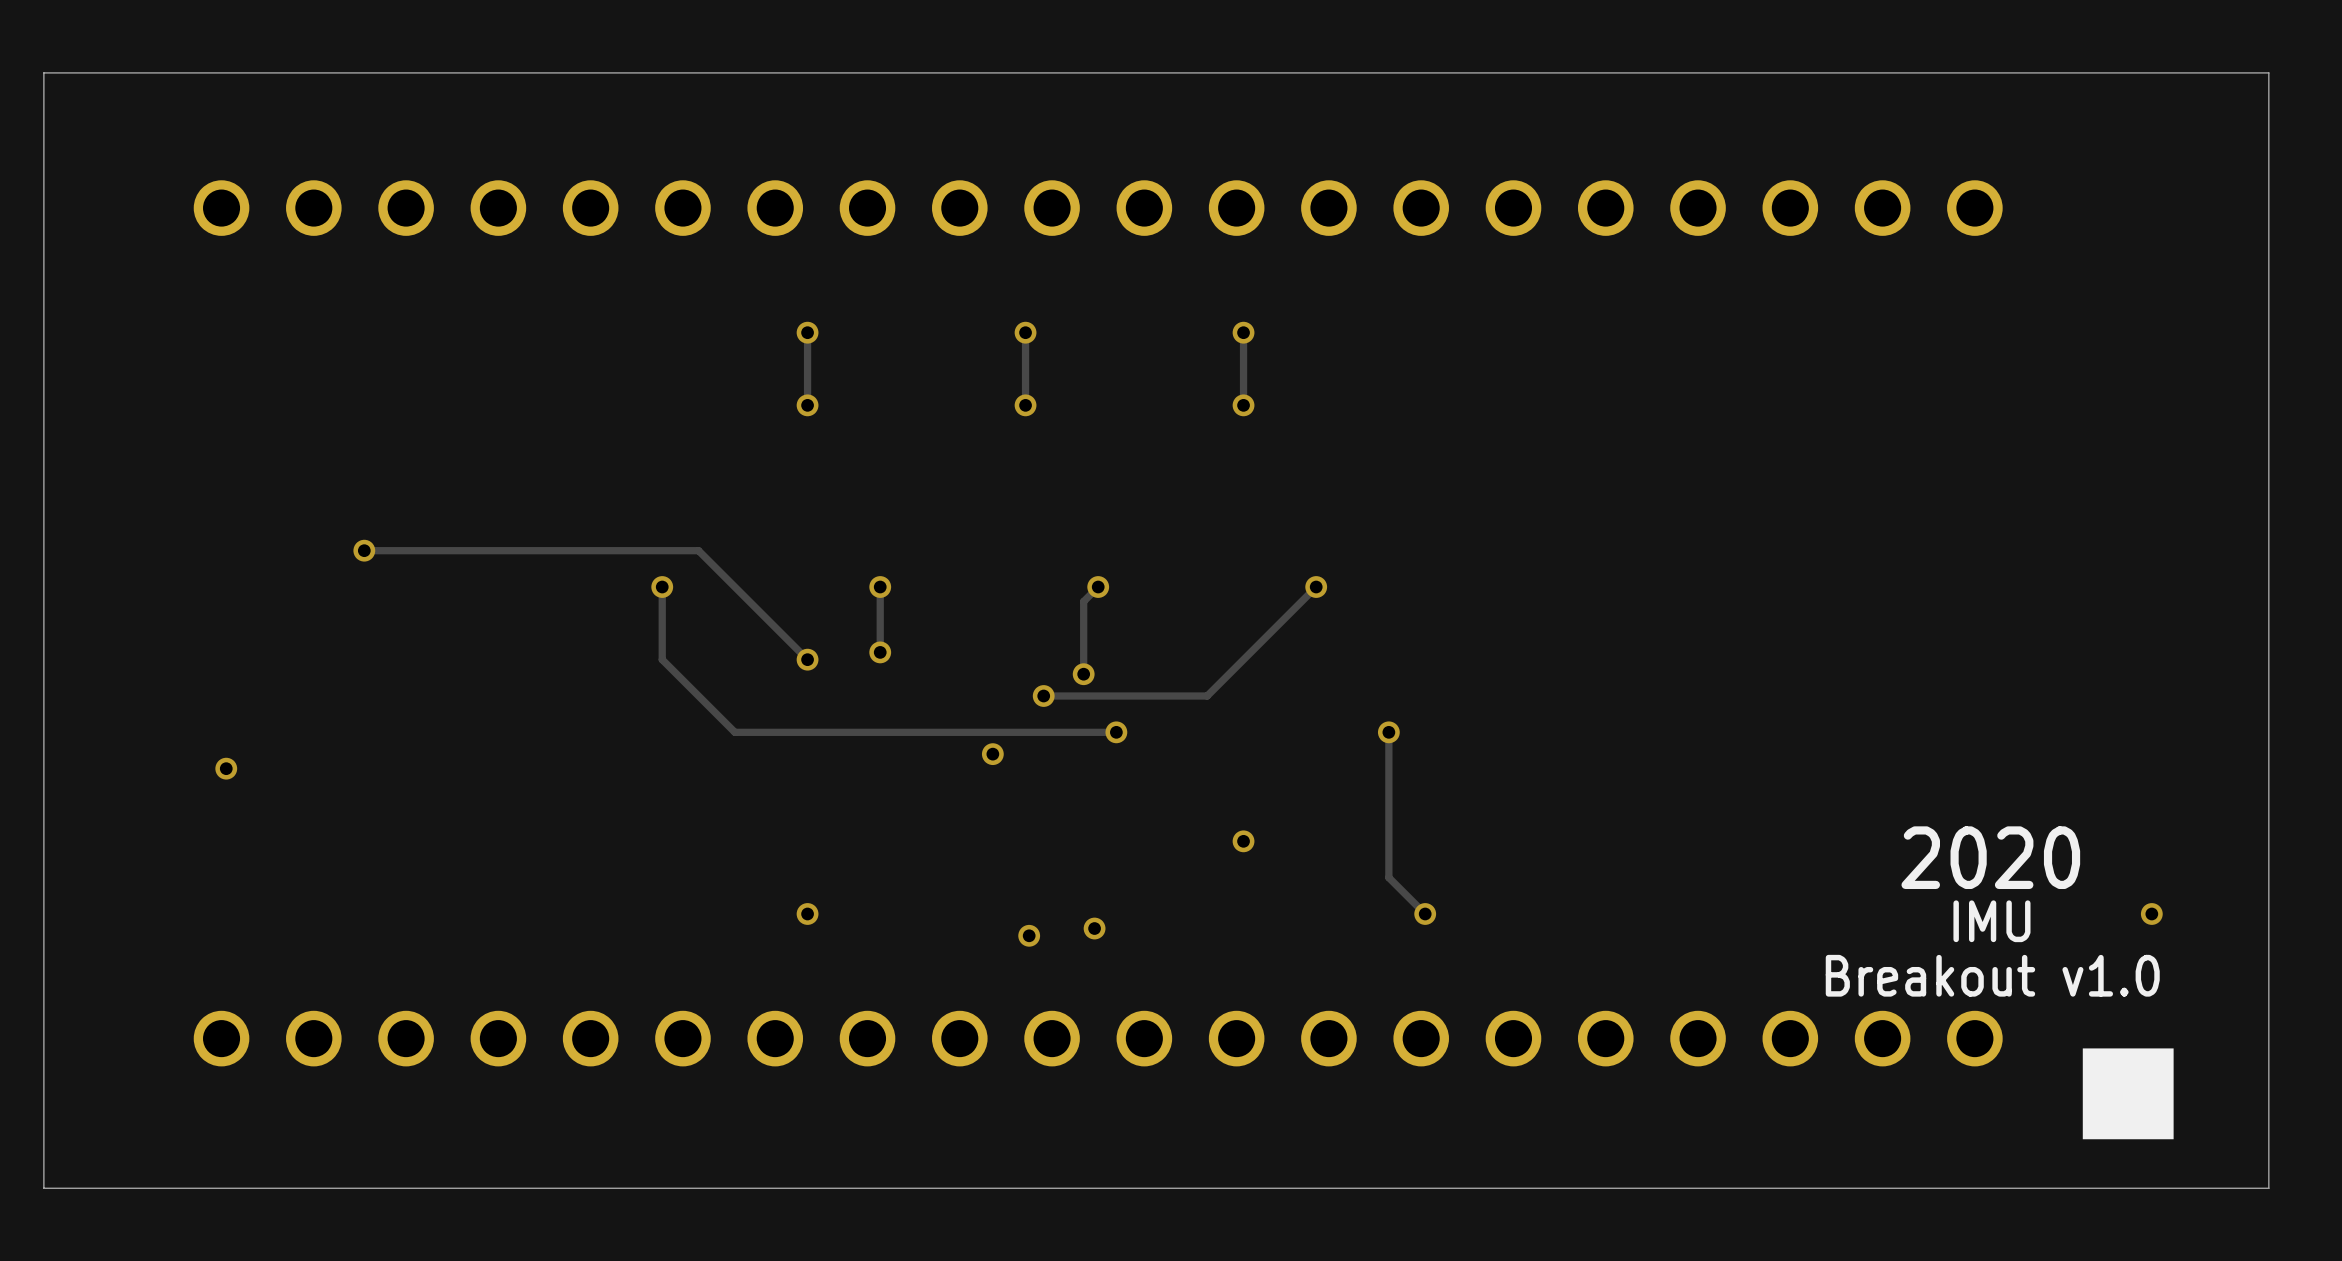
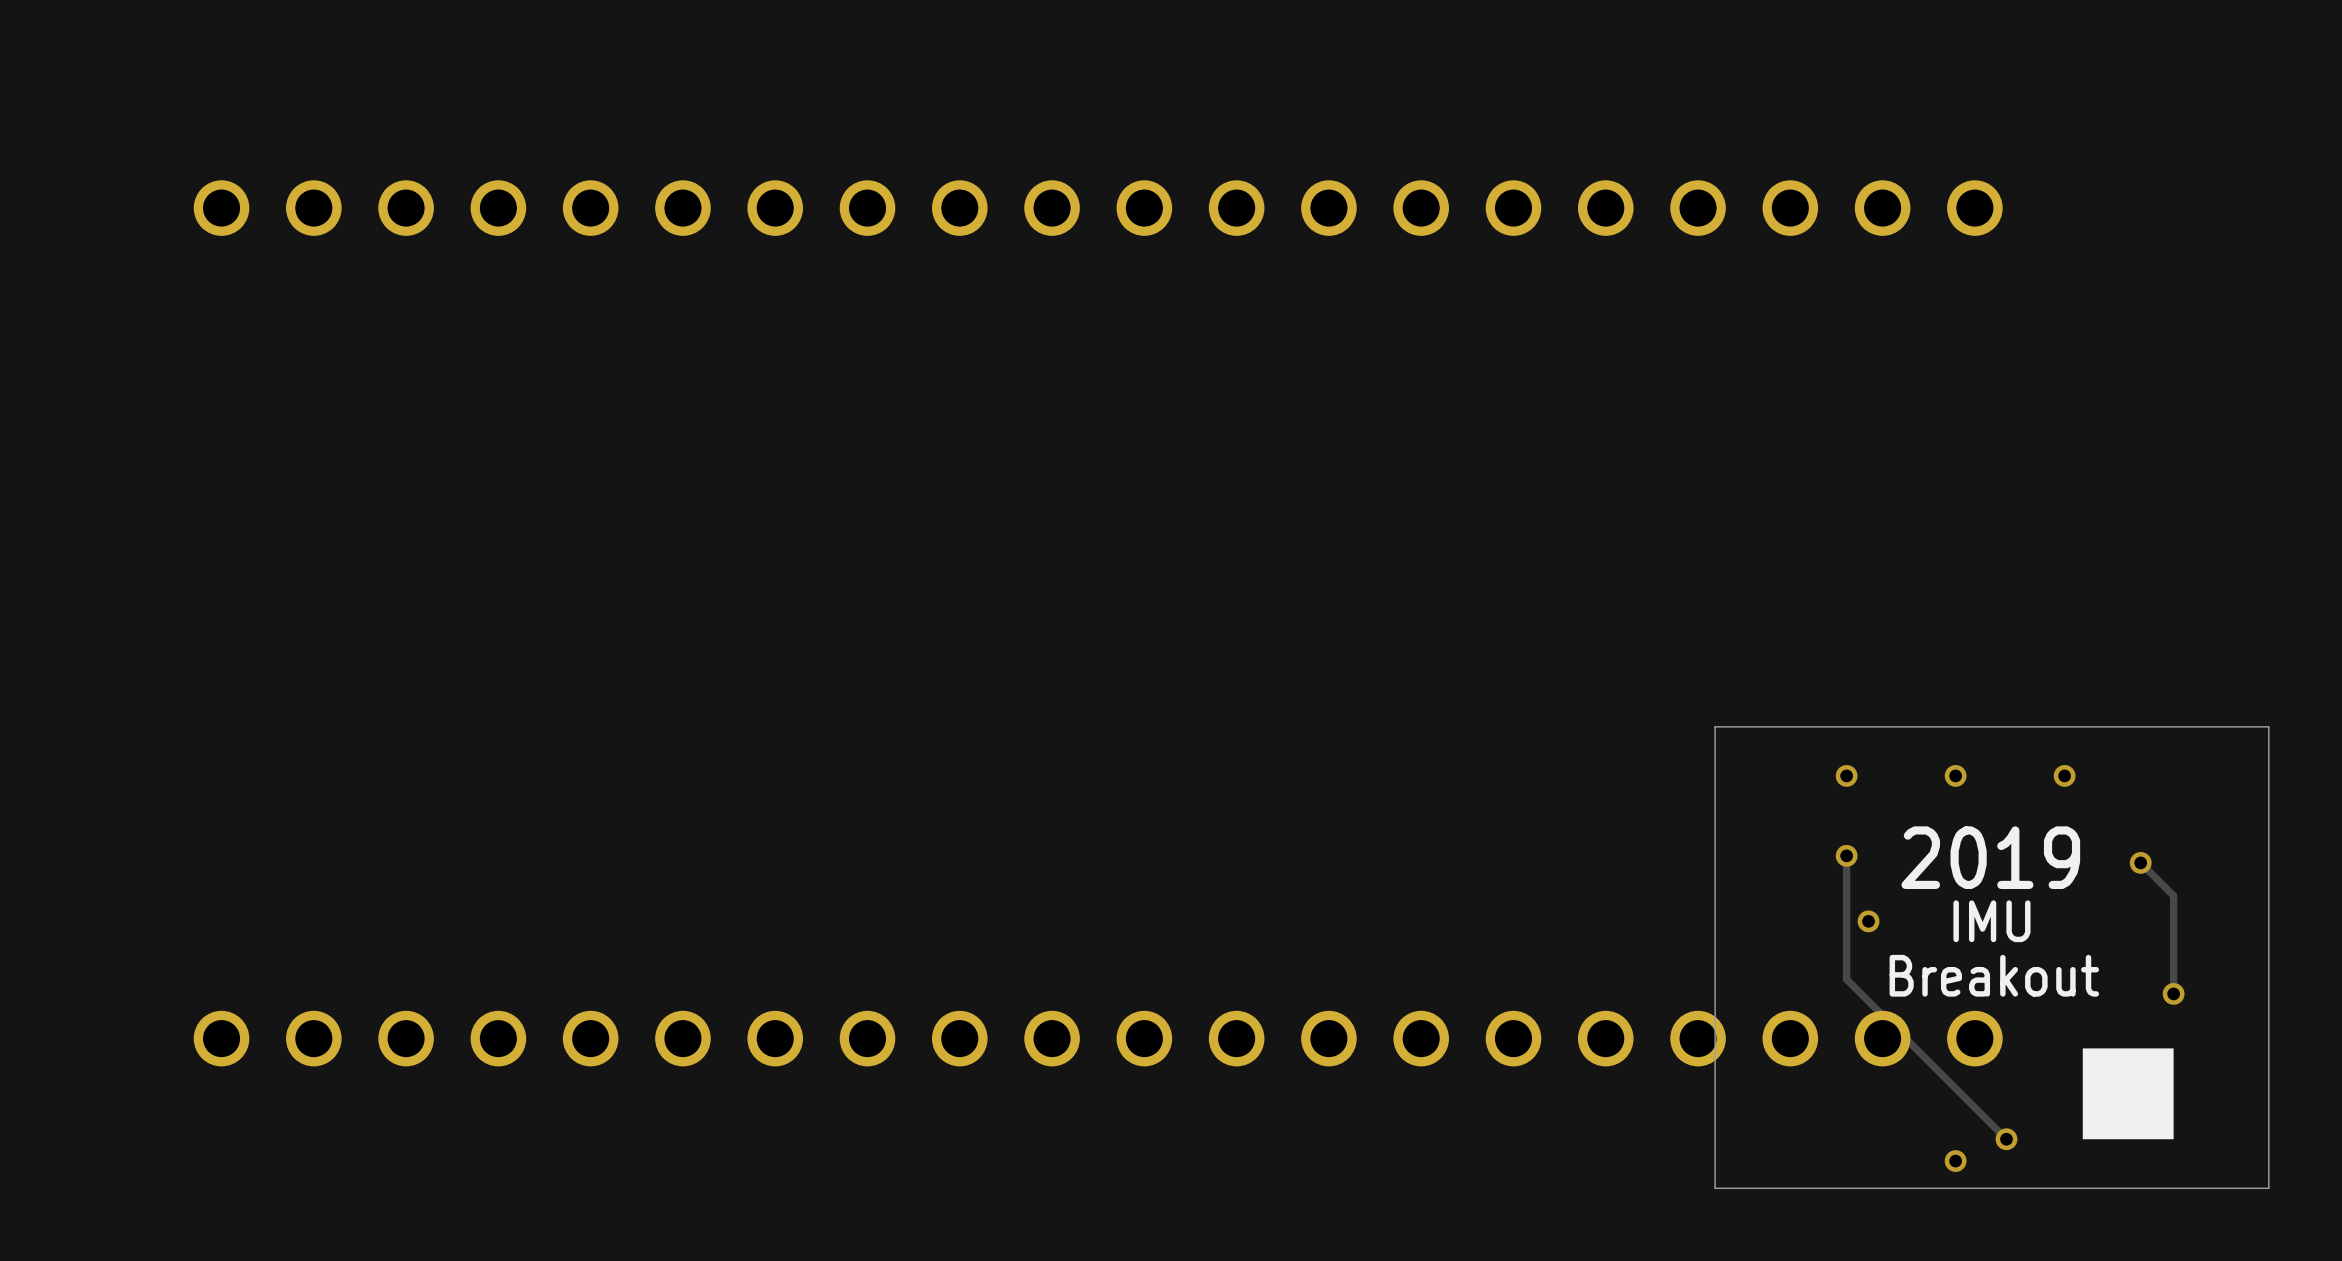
track: (807, 332) (807, 405) -> none
via: (807, 332) -> none
track: (1025, 332) (1025, 405) -> none
via: (1025, 332) -> none
track: (1243, 332) (1243, 405) -> none
via: (1243, 332) -> none
via: (807, 405) -> none
via: (1025, 405) -> none
via: (1243, 405) -> none
track: (364, 550) (698, 550) (807, 659) -> none
via: (364, 550) -> none
track: (662, 587) (662, 659) (734, 732) (1116, 732) -> none
via: (662, 587) -> none
track: (880, 587) (880, 652) -> none
via: (880, 587) -> none
track: (1098, 587) (1083, 601) (1083, 674) -> none
via: (1098, 587) -> none
track: (1316, 587) (1207, 696) (1043, 696) -> none
via: (1316, 587) -> none
via: (880, 652) -> none
via: (807, 659) -> none
via: (1083, 674) -> none
via: (1043, 696) -> none
board edge: (2268, 726) (2268, 72) (43, 72) (43, 1188) (1715, 1188) -> (2268, 726) (1715, 726) (1715, 1188)
via: (1116, 732) -> none
track: (1388, 732) (1388, 877) (1425, 913) -> none
via: (1388, 732) -> none
via: (992, 754) -> none
via: (226, 768) -> none
via: none -> (1846, 775)
via: none -> (1955, 775)
via: none -> (2064, 775)
via: (1243, 841) -> none
track: none -> (1846, 855) (1846, 979) (2006, 1139)
via: none -> (1846, 855)
text: 2020 (1990, 857) -> 2019 (1990, 857)
track: none -> (2140, 862) (2173, 895) (2173, 993)
via: none -> (2140, 862)
via: (807, 913) -> none
via: (1425, 913) -> none
via: (2151, 913) -> none
via: none -> (1868, 921)
via: (1094, 928) -> none
via: (1029, 935) -> none
text: Breakout v1.0 (1992, 975) -> Breakout (1994, 975)
via: none -> (2173, 993)
via: none -> (2006, 1139)
via: none -> (1955, 1161)

